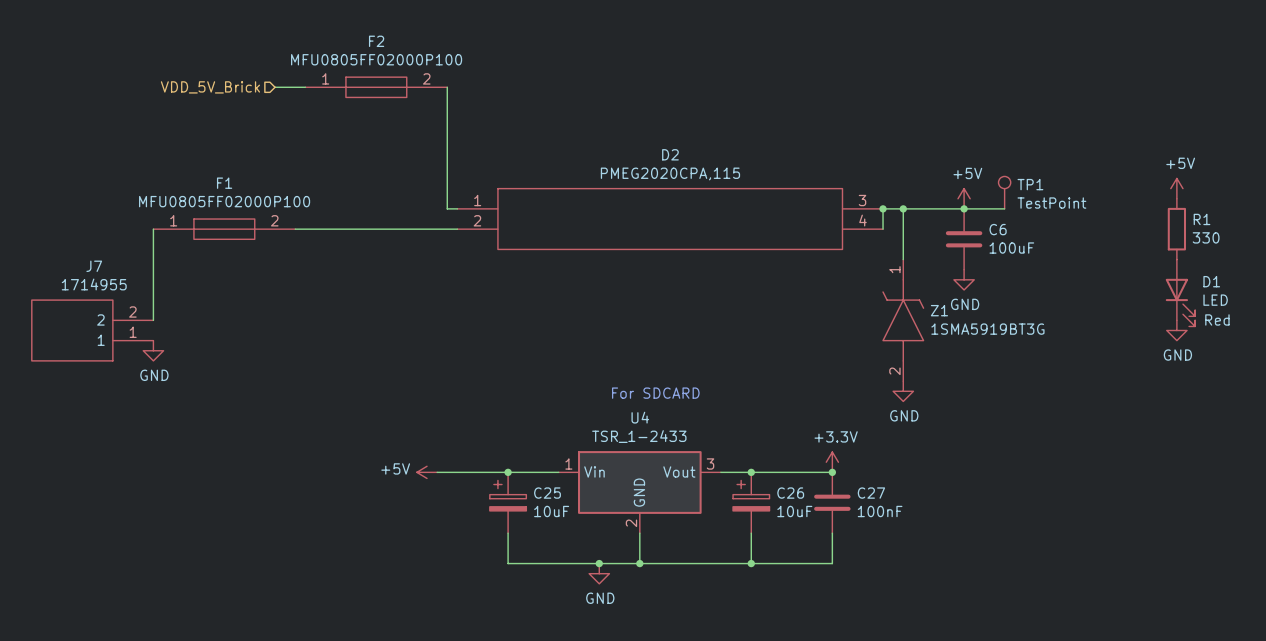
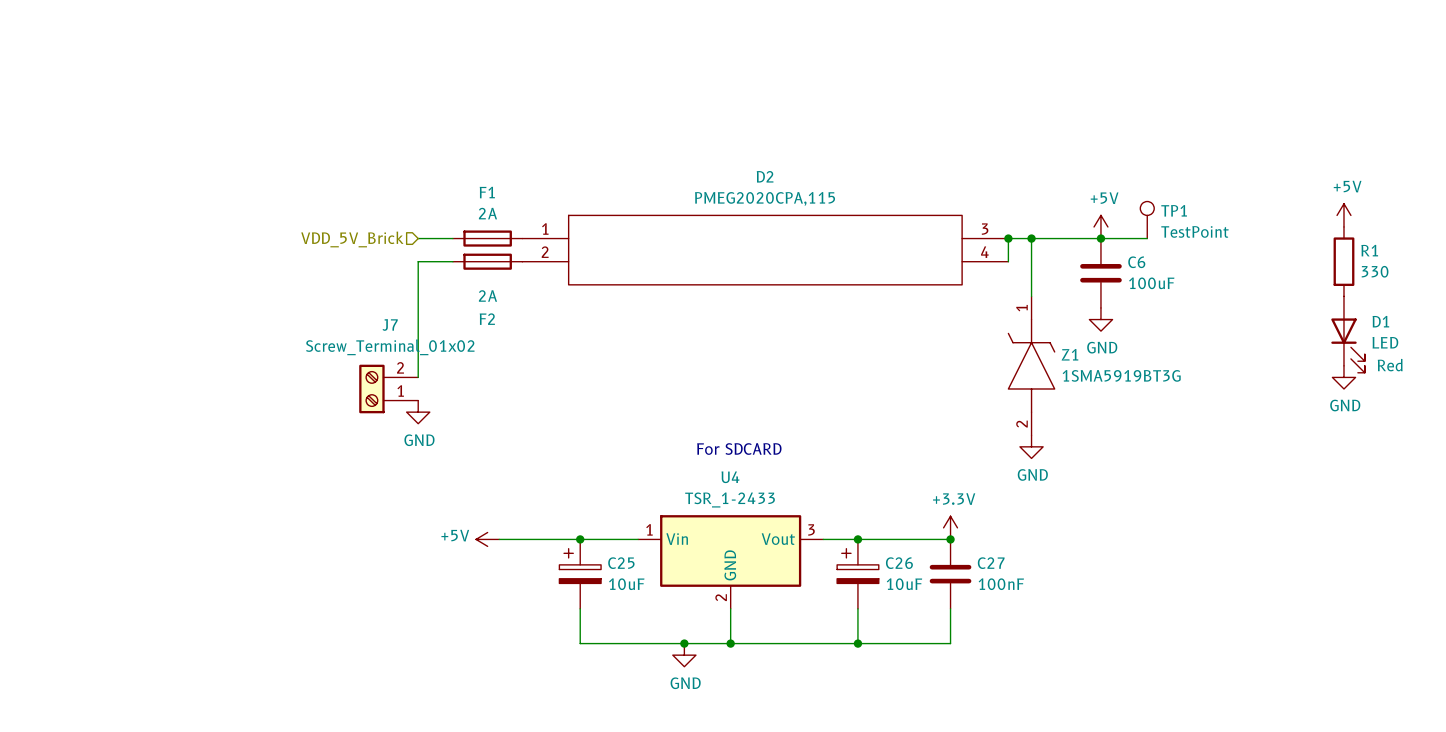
F2 name position: F2 (376, 41) -> F2 (487, 319)
F2 value: MFU0805FF02000P100 (376, 59) -> 2A (487, 295)
F2 symbol: [305, 76, 448, 99] -> [452, 253, 523, 270]
hierarchical label position: VDD_5V_Brick (210, 87) -> VDD_5V_Brick (352, 239)
wire: (275, 87) (305, 87) -> (418, 238) (452, 238)
wire: (447, 87) (447, 208) (457, 208) -> none
F1 value: MFU0805FF02000P100 (224, 201) -> 2A (487, 213)
F1 symbol: [153, 218, 296, 240] -> [452, 230, 523, 247]
wire: (153, 229) (153, 320) -> none
wire: (295, 229) (366, 229) -> (418, 377) (418, 261)
J7 value: 1714955 (94, 284) -> Screw_Terminal_01x02 (390, 347)
J7 symbol: [31, 299, 154, 362] -> [359, 364, 419, 414]
power symbol: GND (153, 350) -> none
power symbol: none -> GND (418, 412)

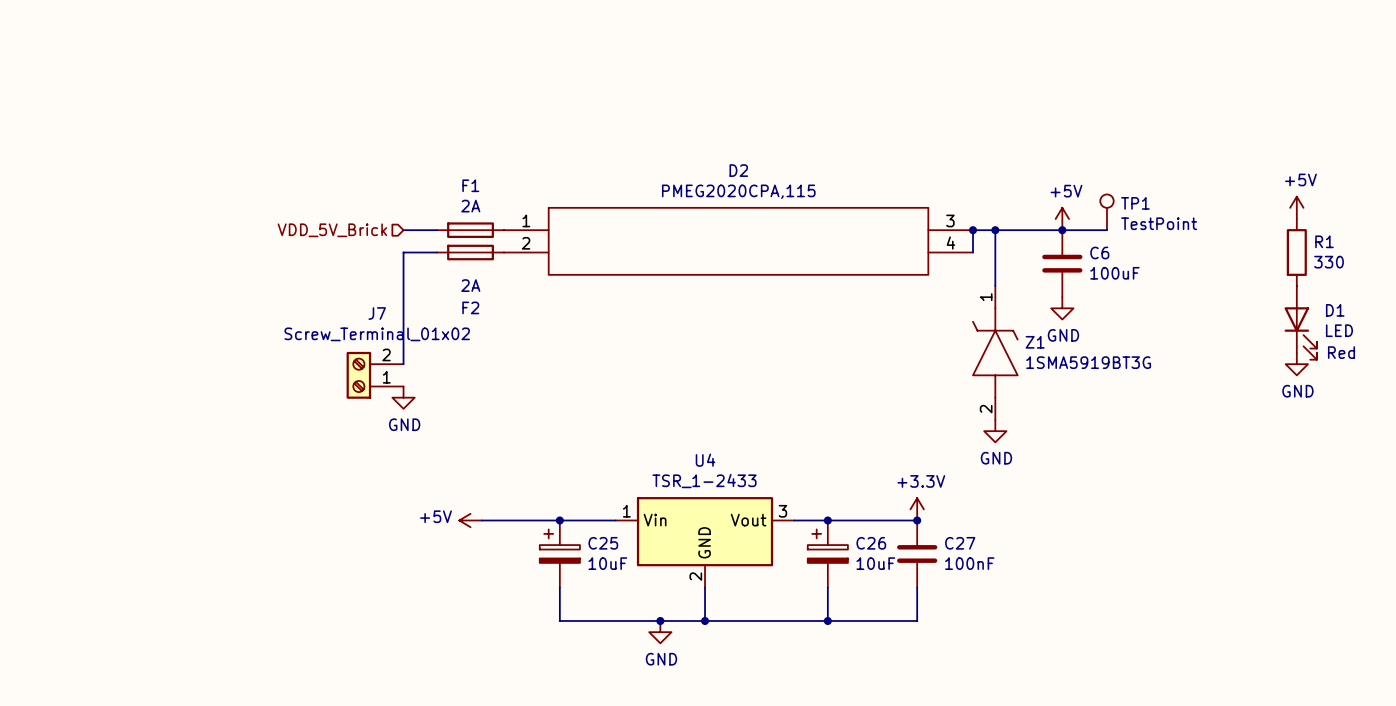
text: For SDCARD (739, 449) -> none

